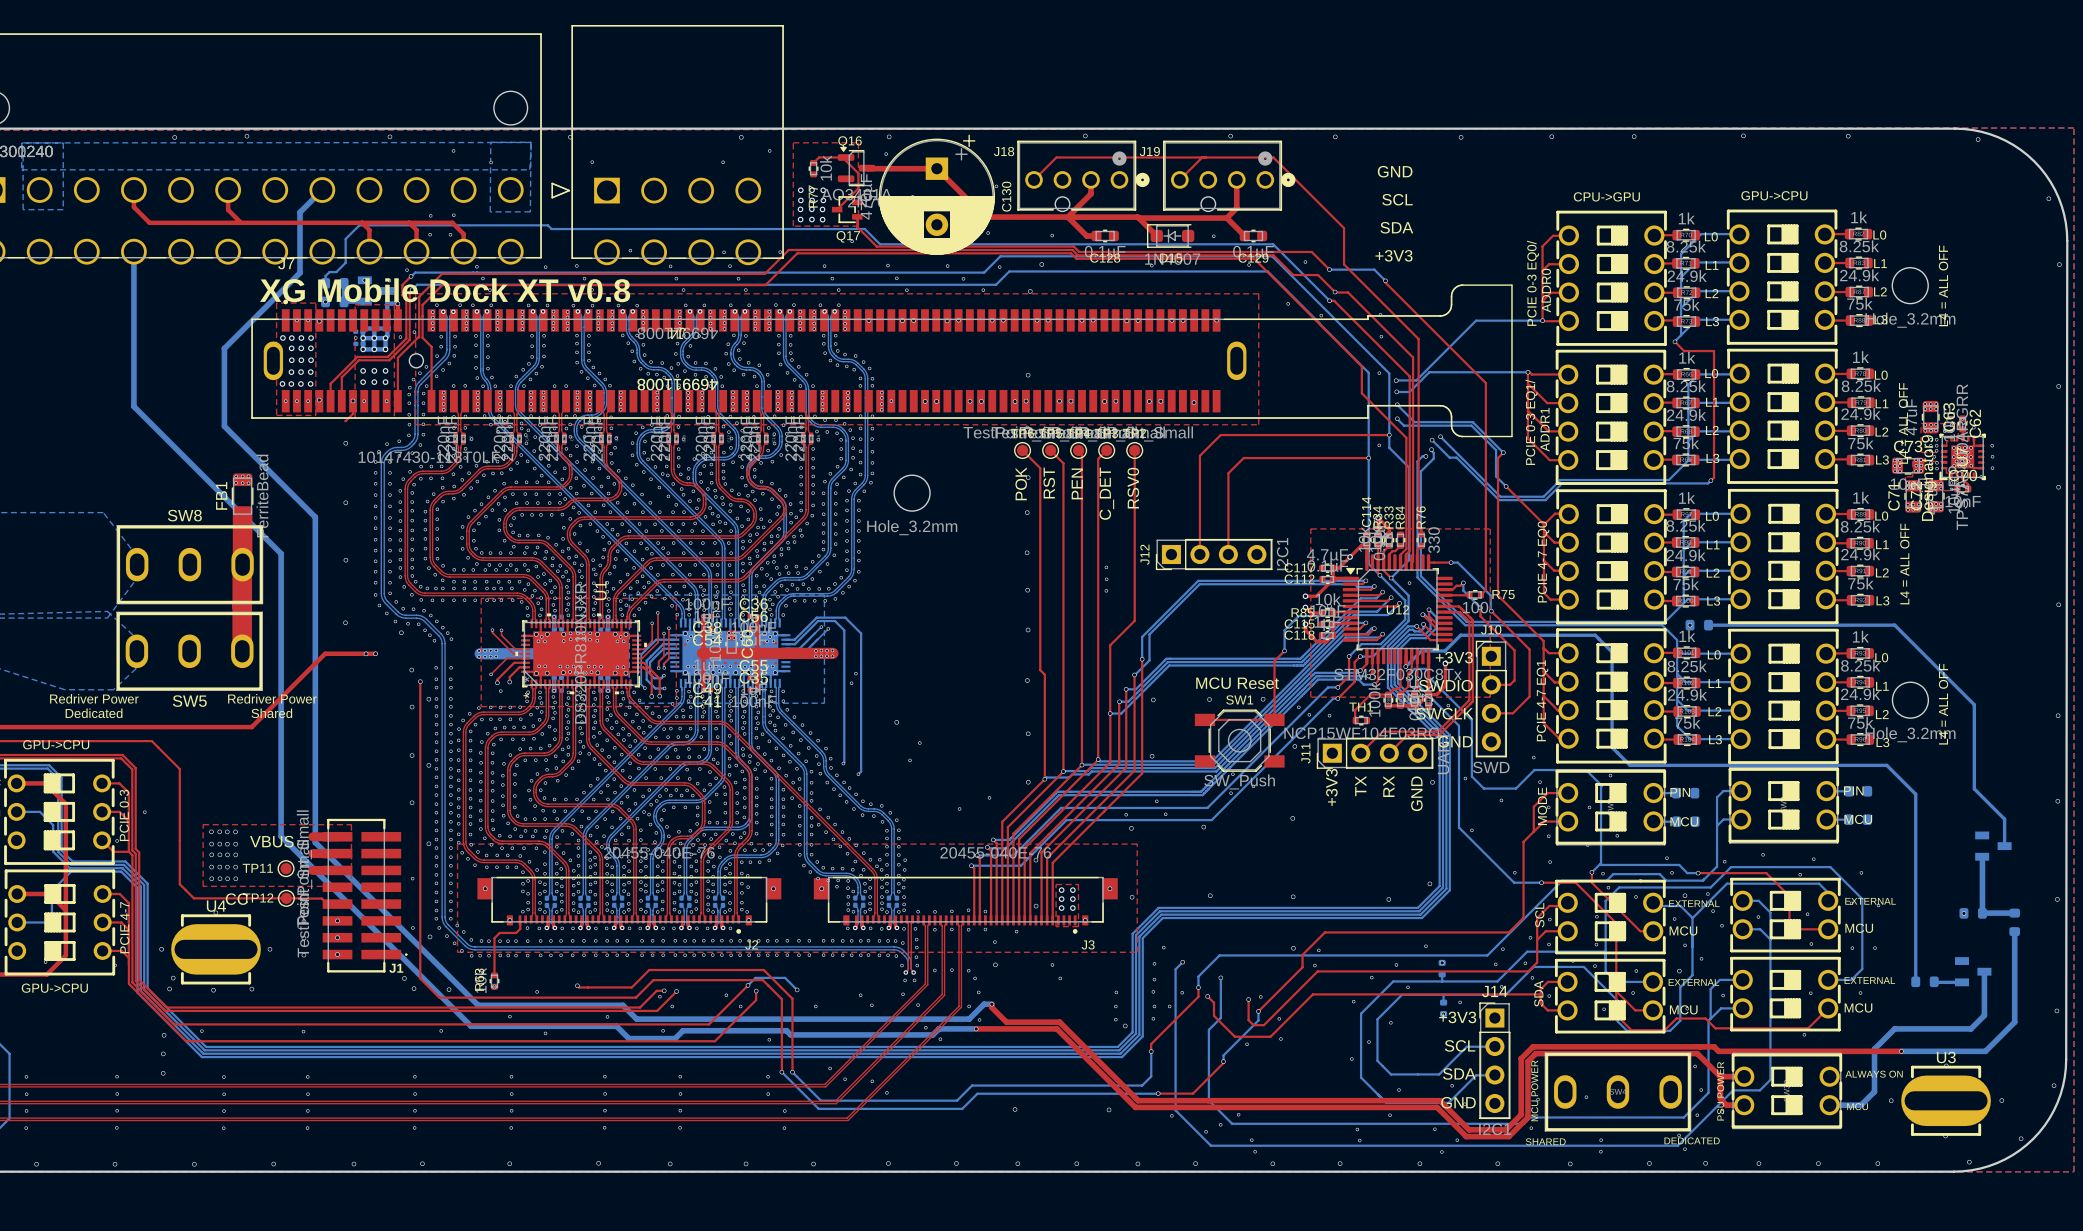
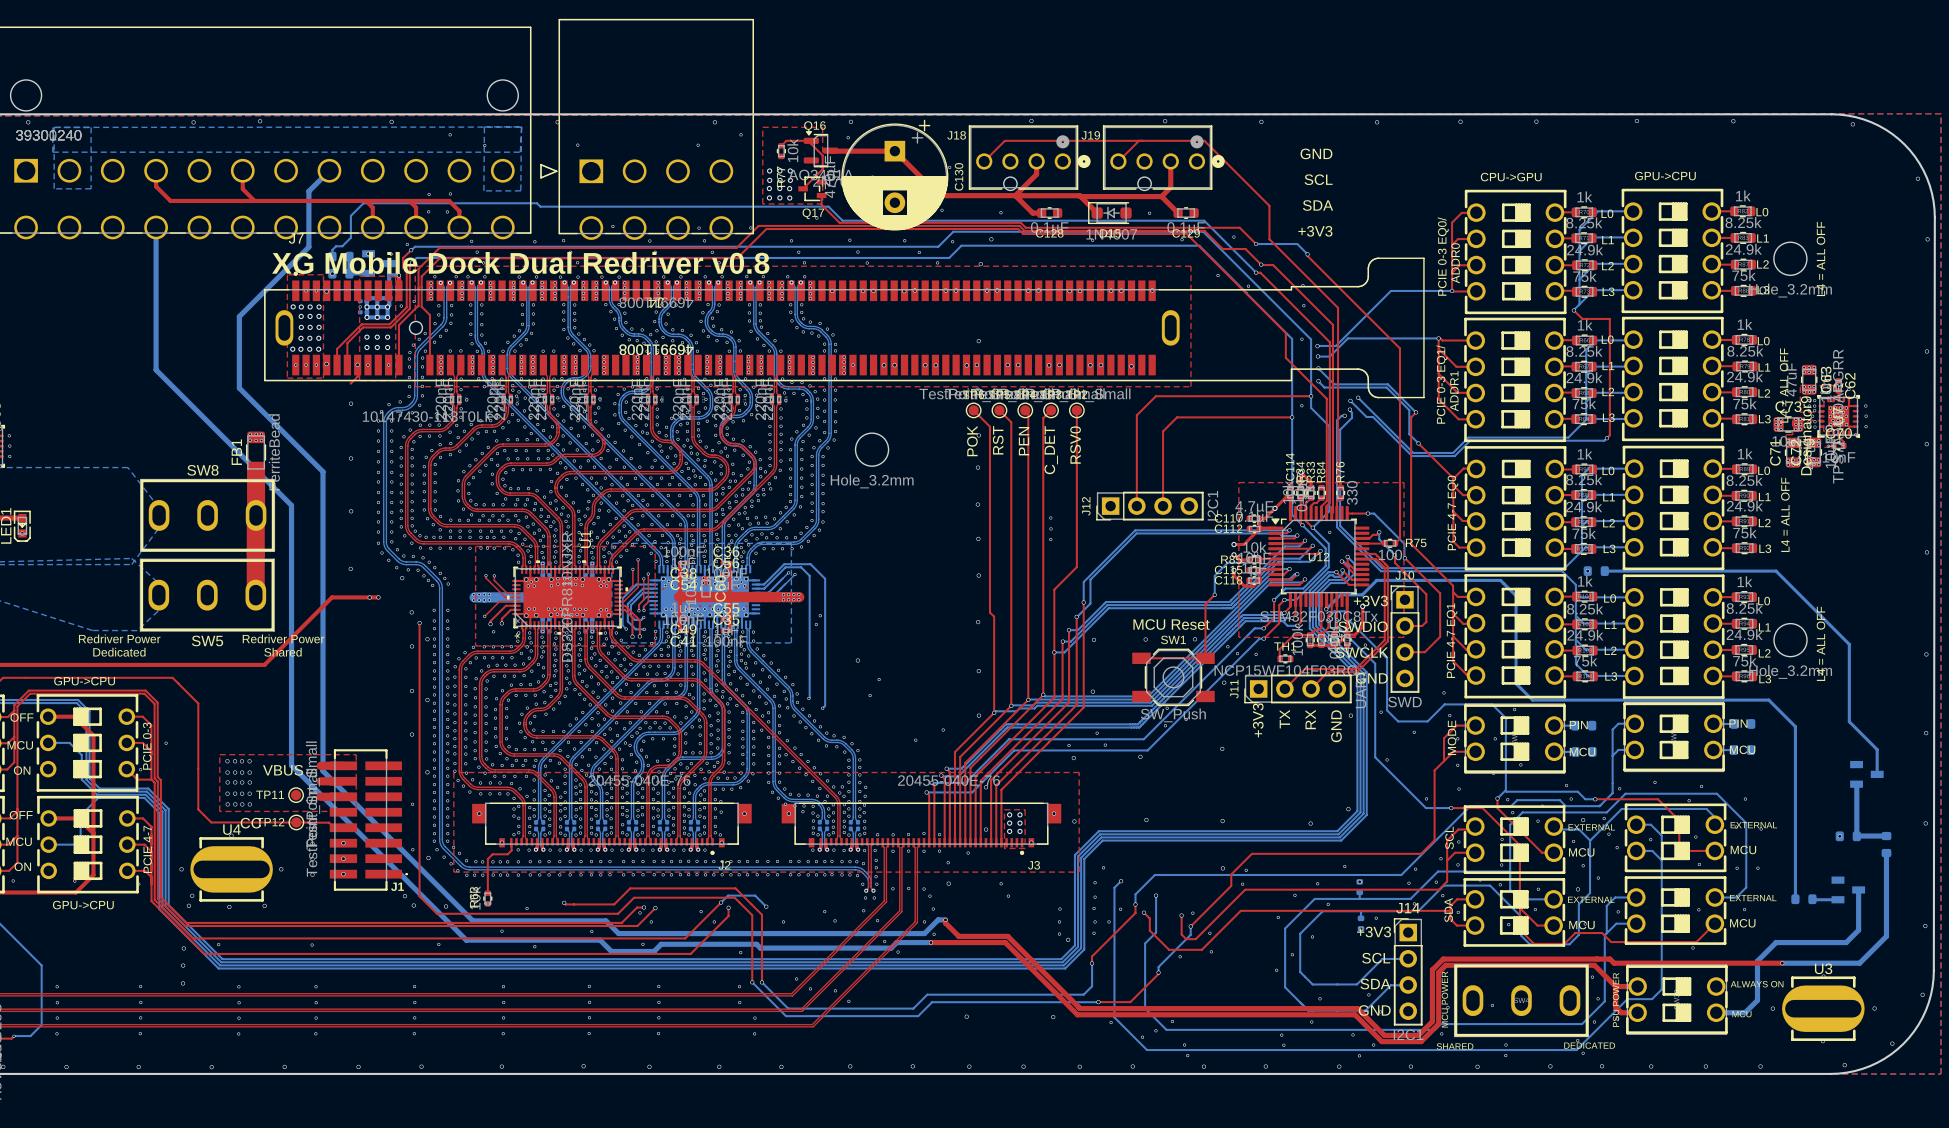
text: XG Mobile Dock XT v0.8 (445, 290) -> XG Mobile Dock Dual Redriver v0.8 (520, 262)

